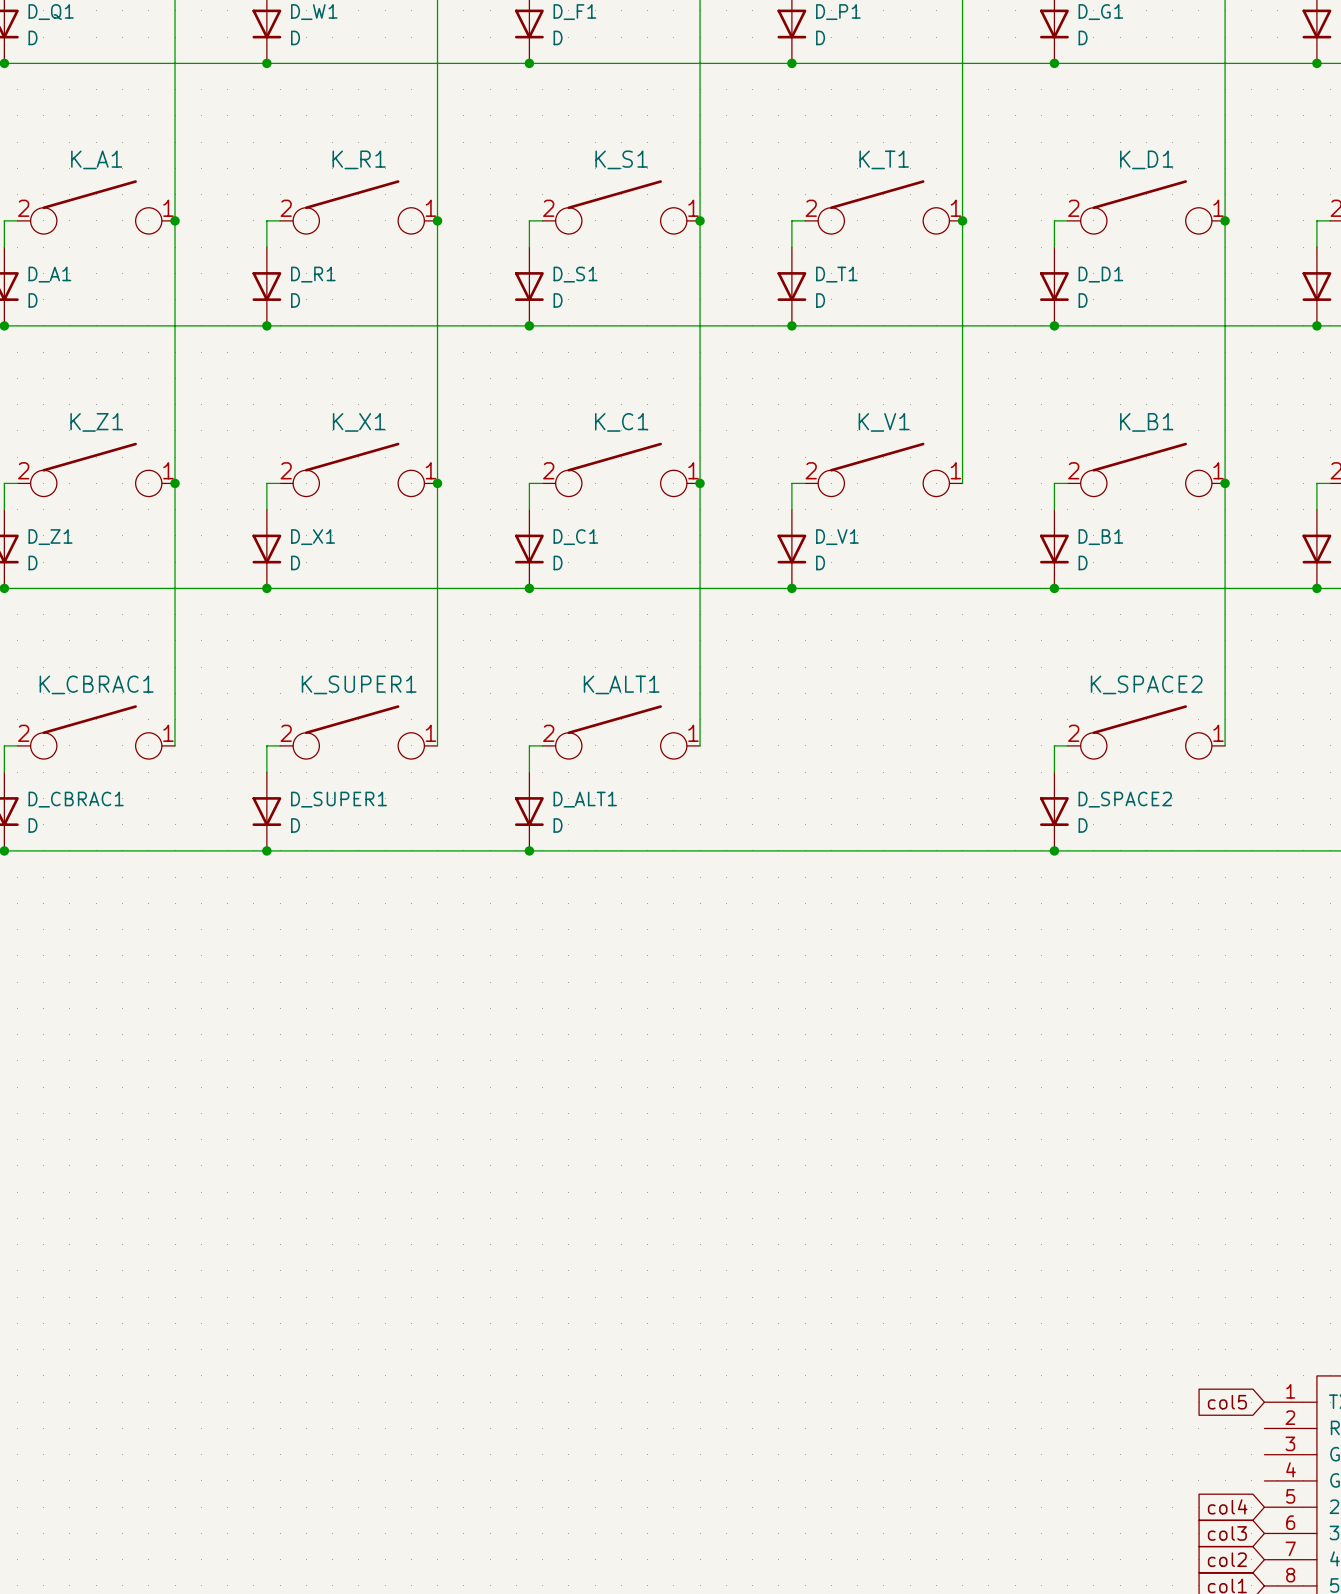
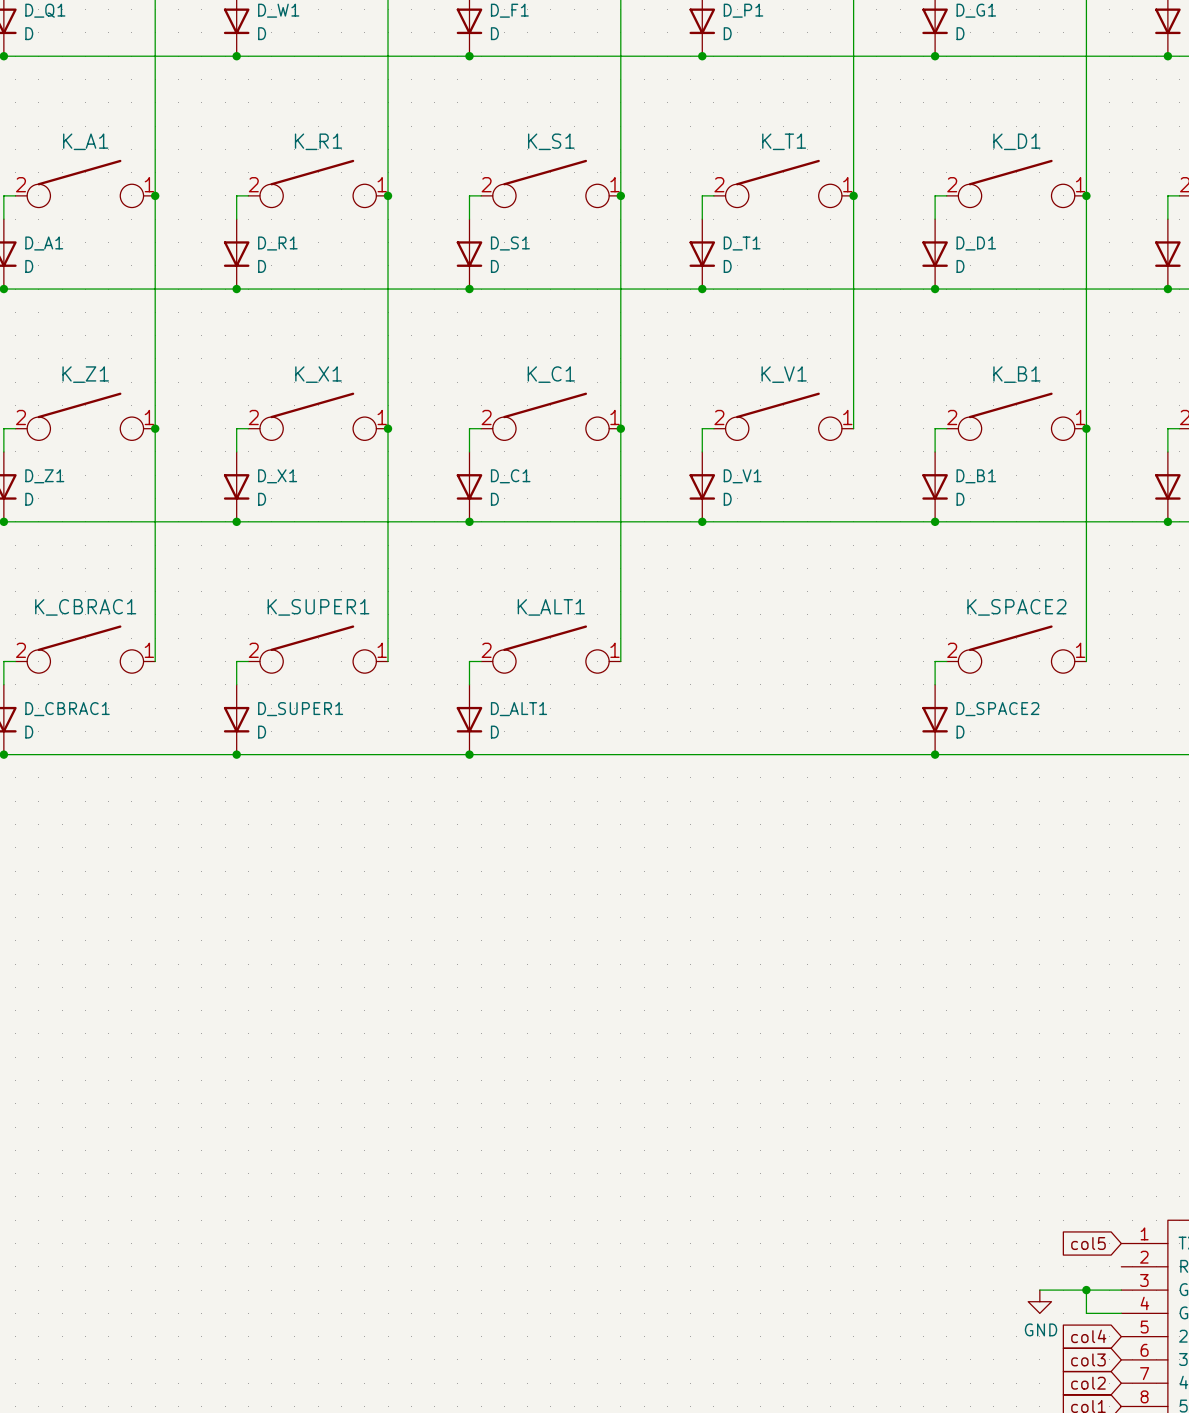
wire: none -> (1039, 1290) (1121, 1290)
wire: none -> (1086, 1290) (1086, 1313) (1121, 1313)
junction: none -> (1086, 1290)
power symbol: none -> GND (1039, 1301)

